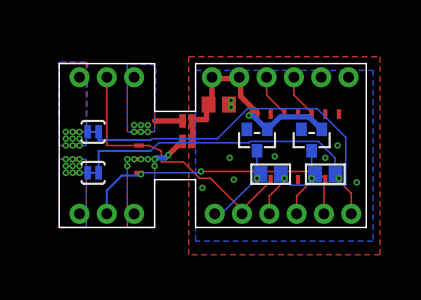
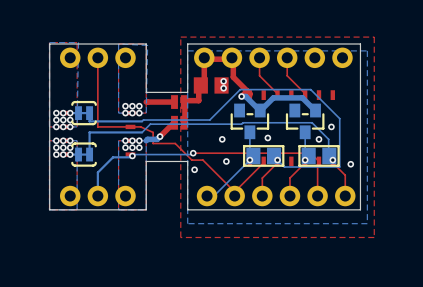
via: (127, 159) -> none
via: (154, 159) -> none
via: (127, 166) -> none
via: none -> (125, 147)
via: none -> (132, 147)
via: none -> (139, 147)
via: (154, 166) -> none

